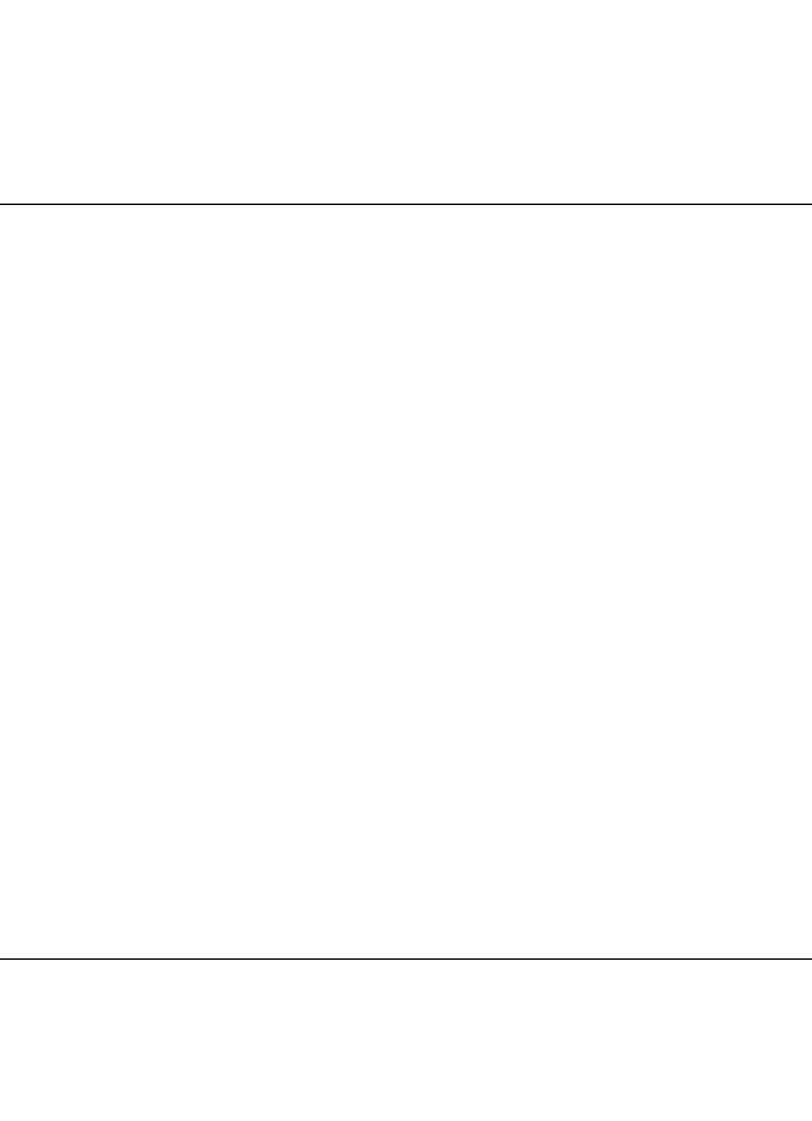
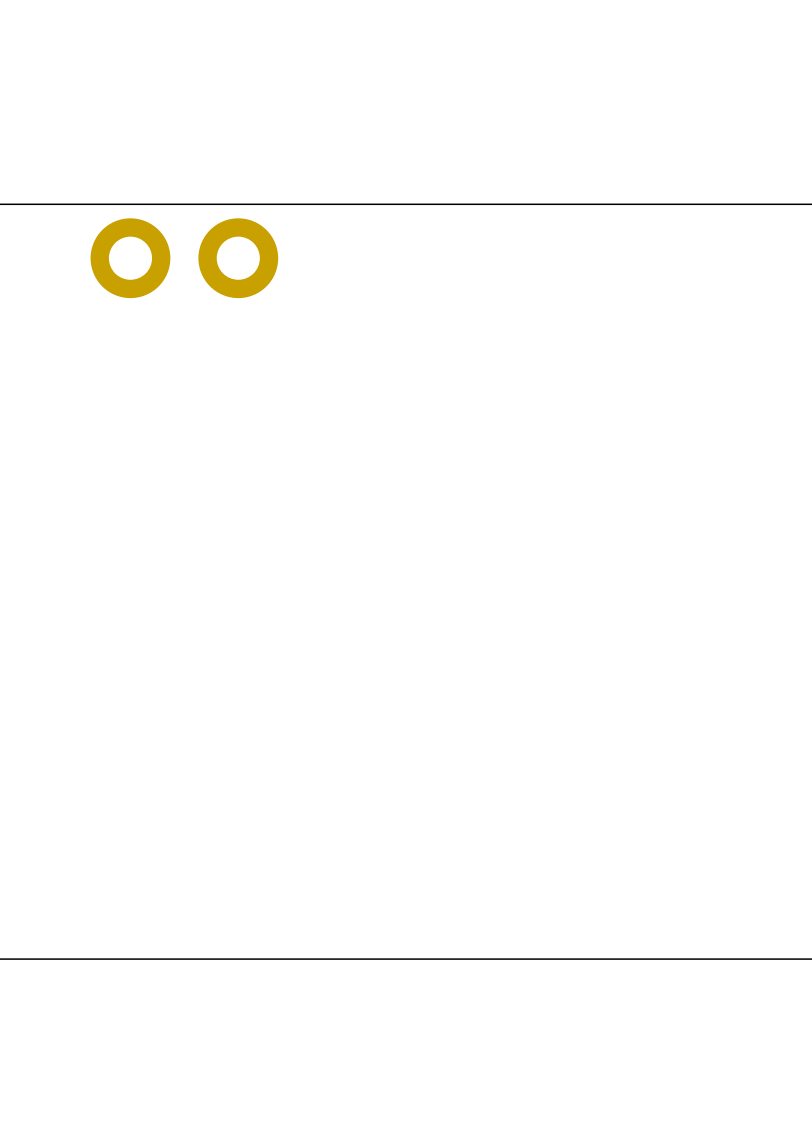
part: none -> (184, 258)

